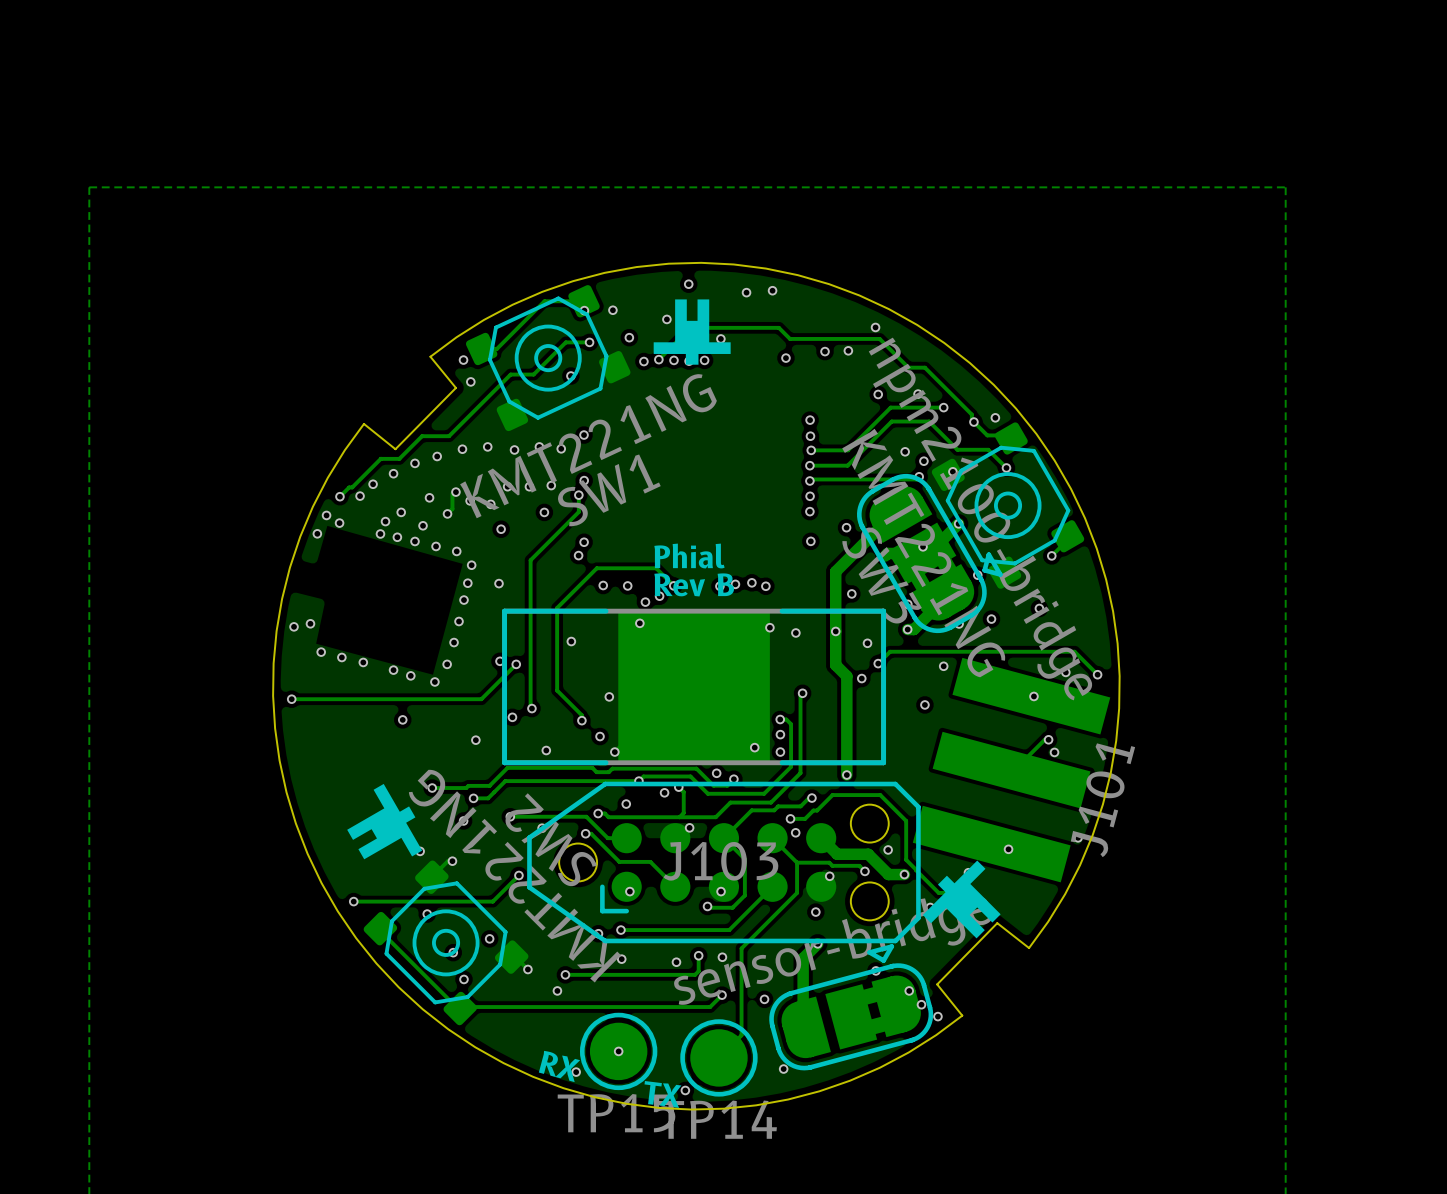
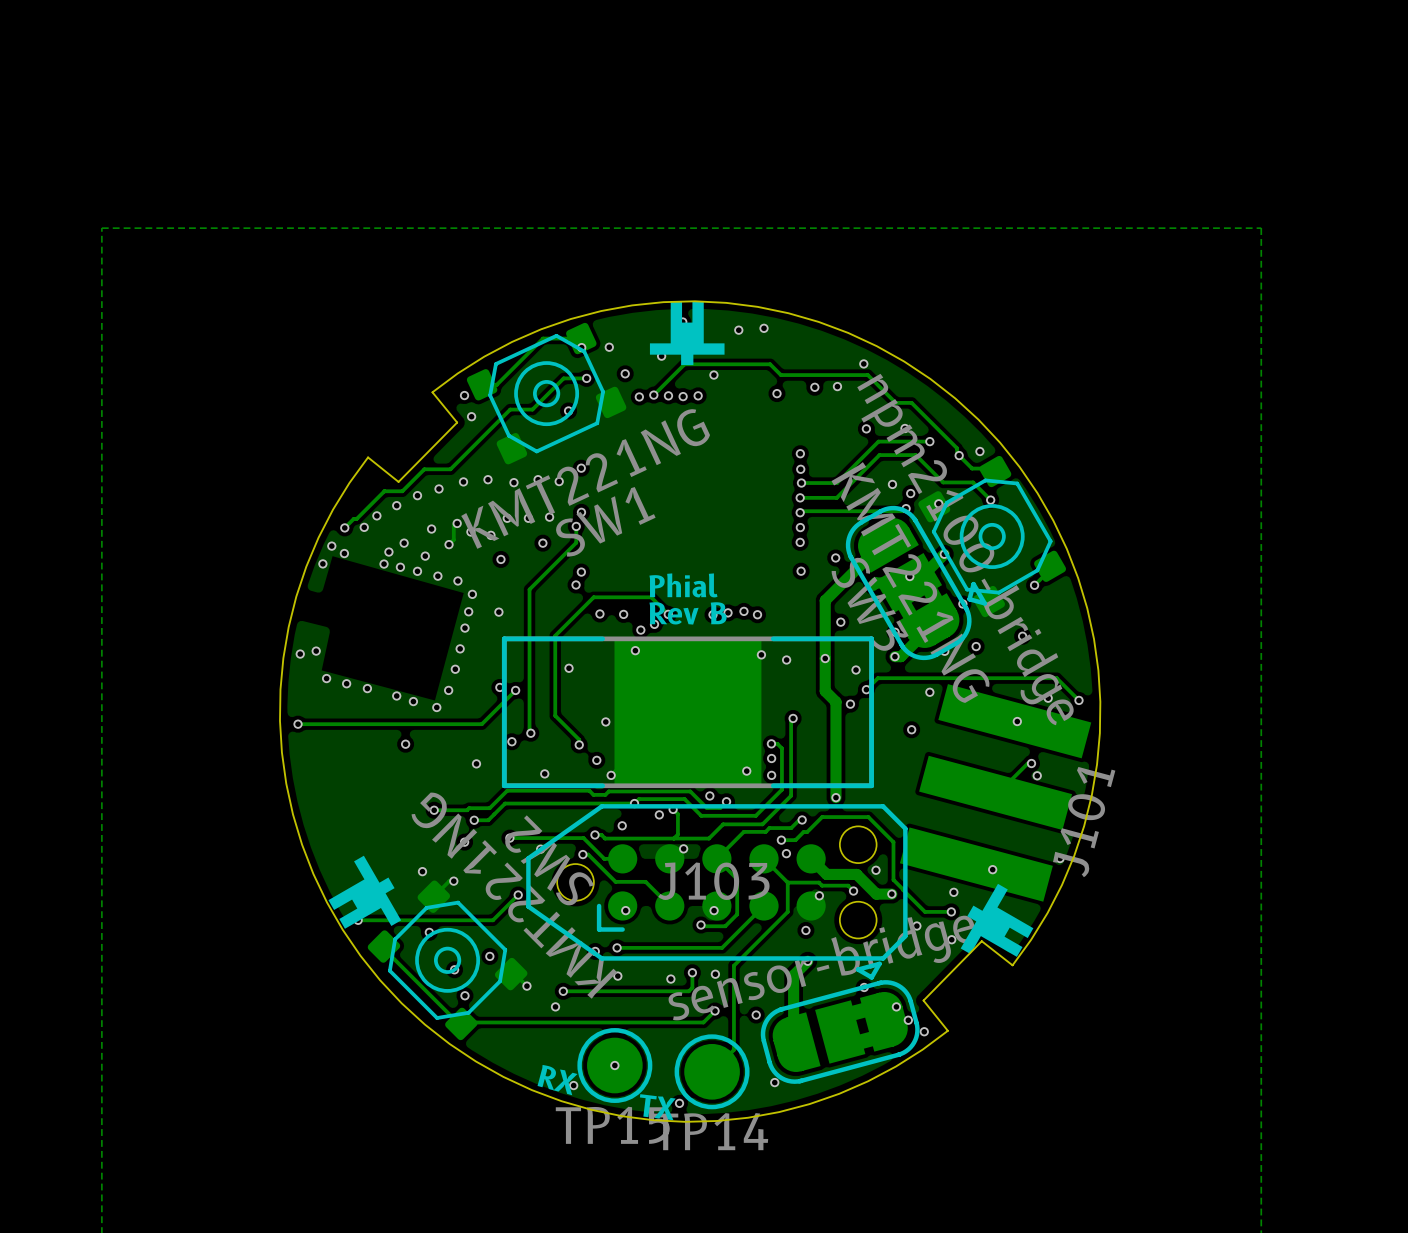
drawing position: (692, 332) -> (687, 333)
drawing position: (384, 821) -> (364, 892)
drawing: [922, 860, 1001, 939] -> none
drawing: none -> [960, 883, 1034, 957]

